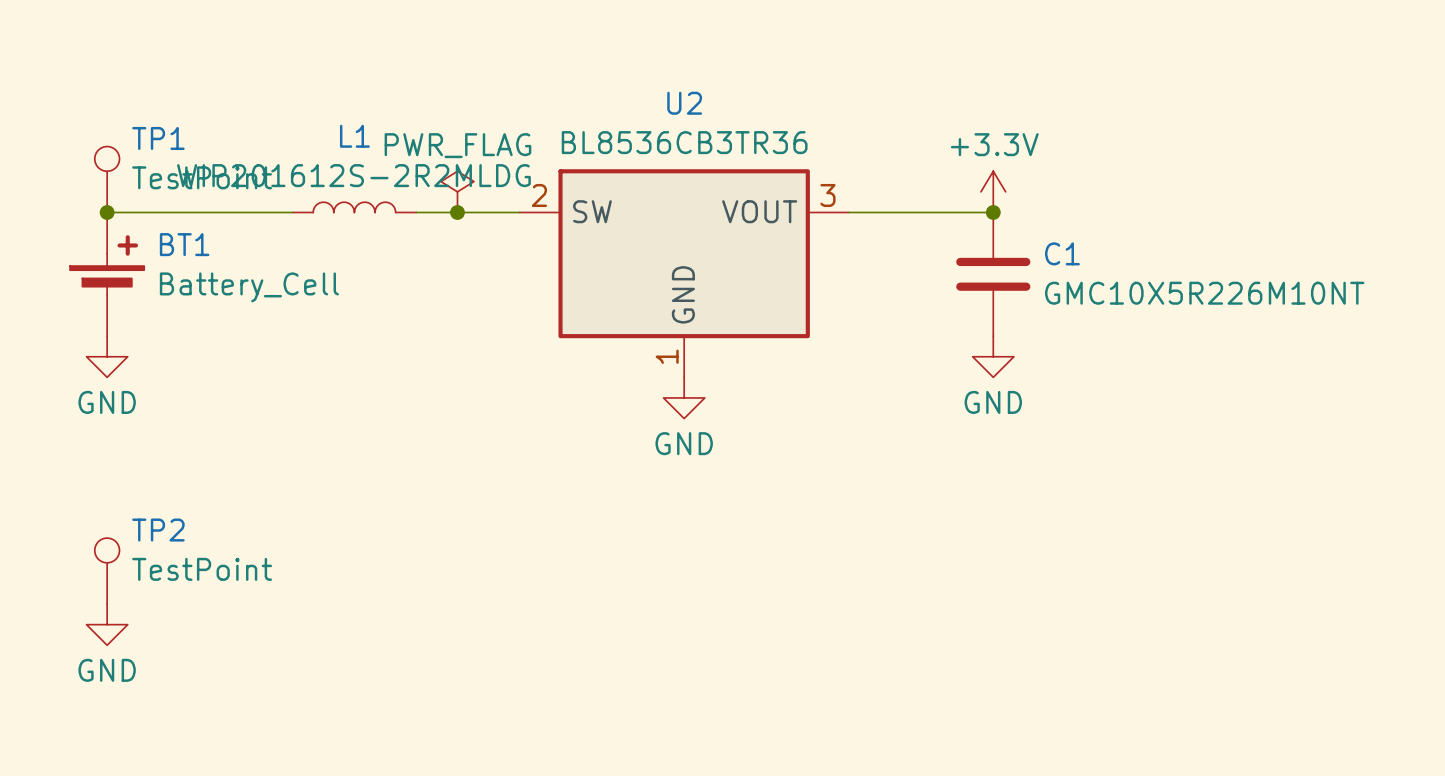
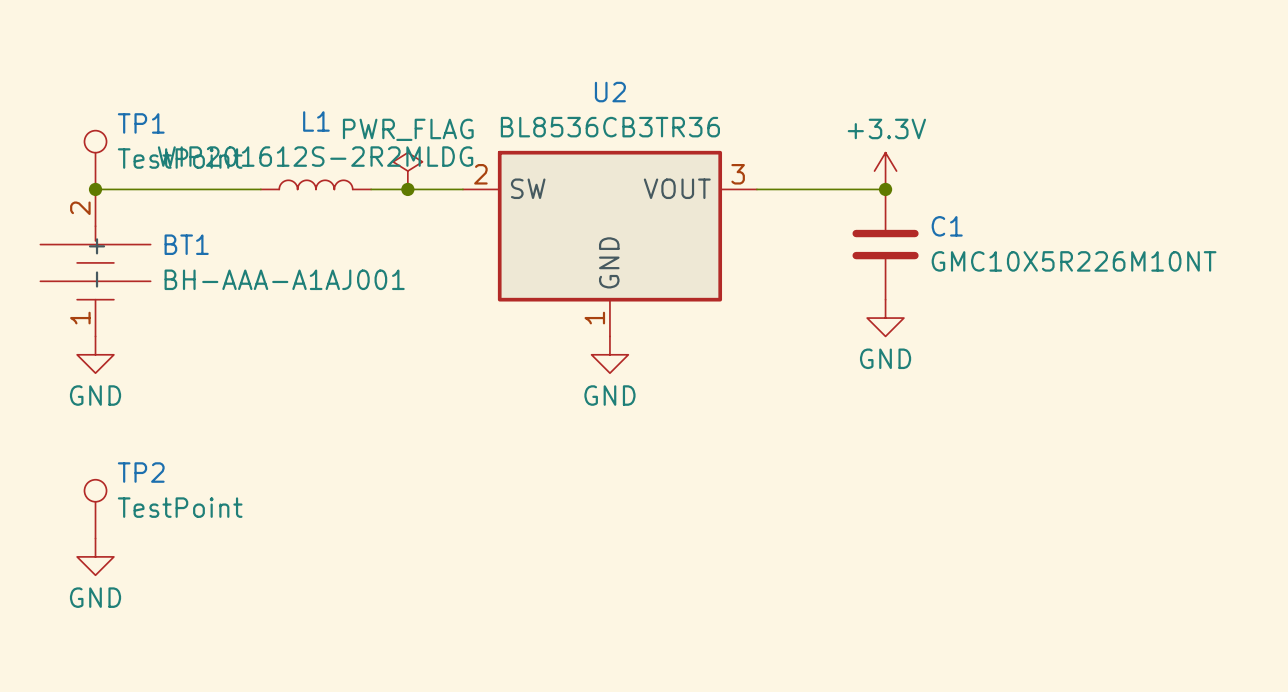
BT1 symbol: [70, 212, 145, 337] -> [40, 189, 151, 337]
BT1 value: Battery_Cell (249, 287) -> BH-AAA-A1AJ001 (284, 279)
power symbol position: GND (107, 356) -> GND (95, 354)

